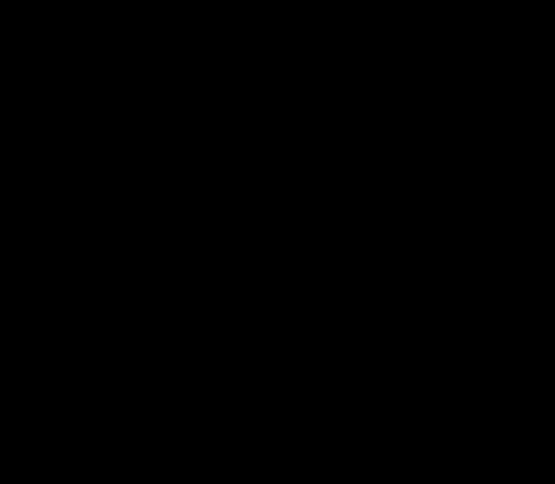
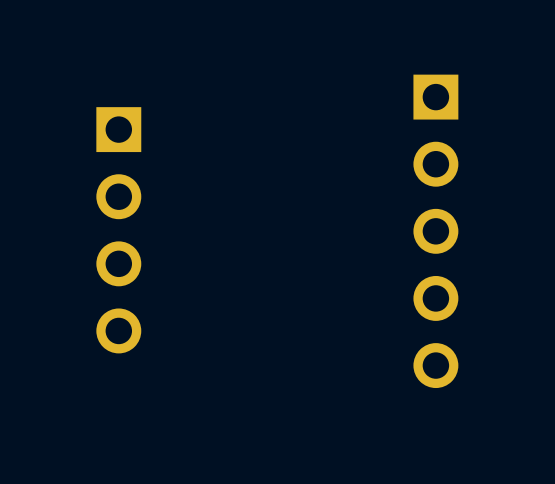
part: none -> (118, 230)
part: none -> (435, 231)

